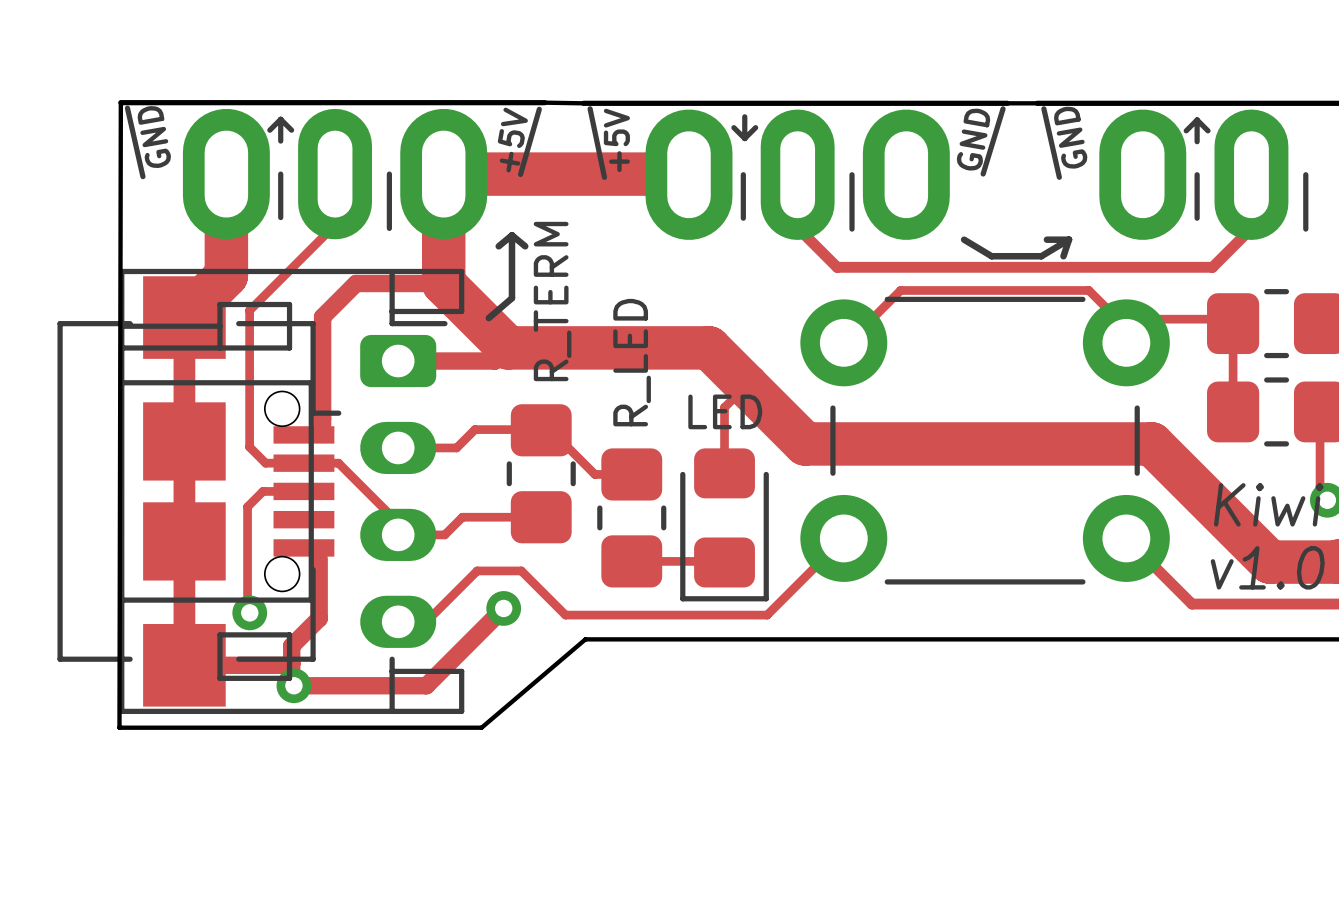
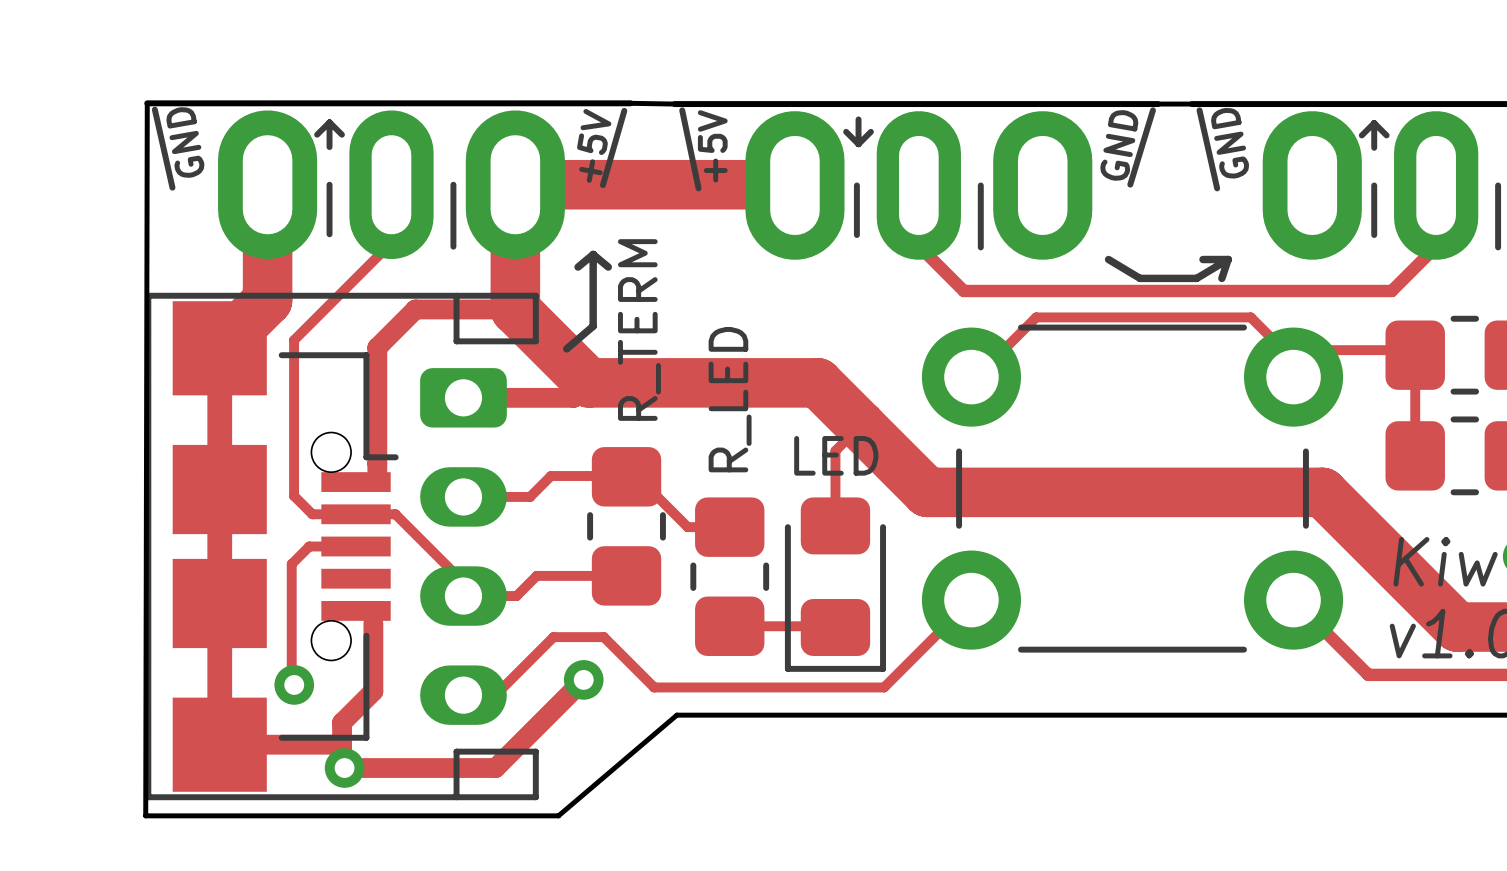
part footprint: [119, 268, 465, 714] -> [145, 292, 539, 801]
part: (199, 491) -> none
part: none -> (285, 546)

